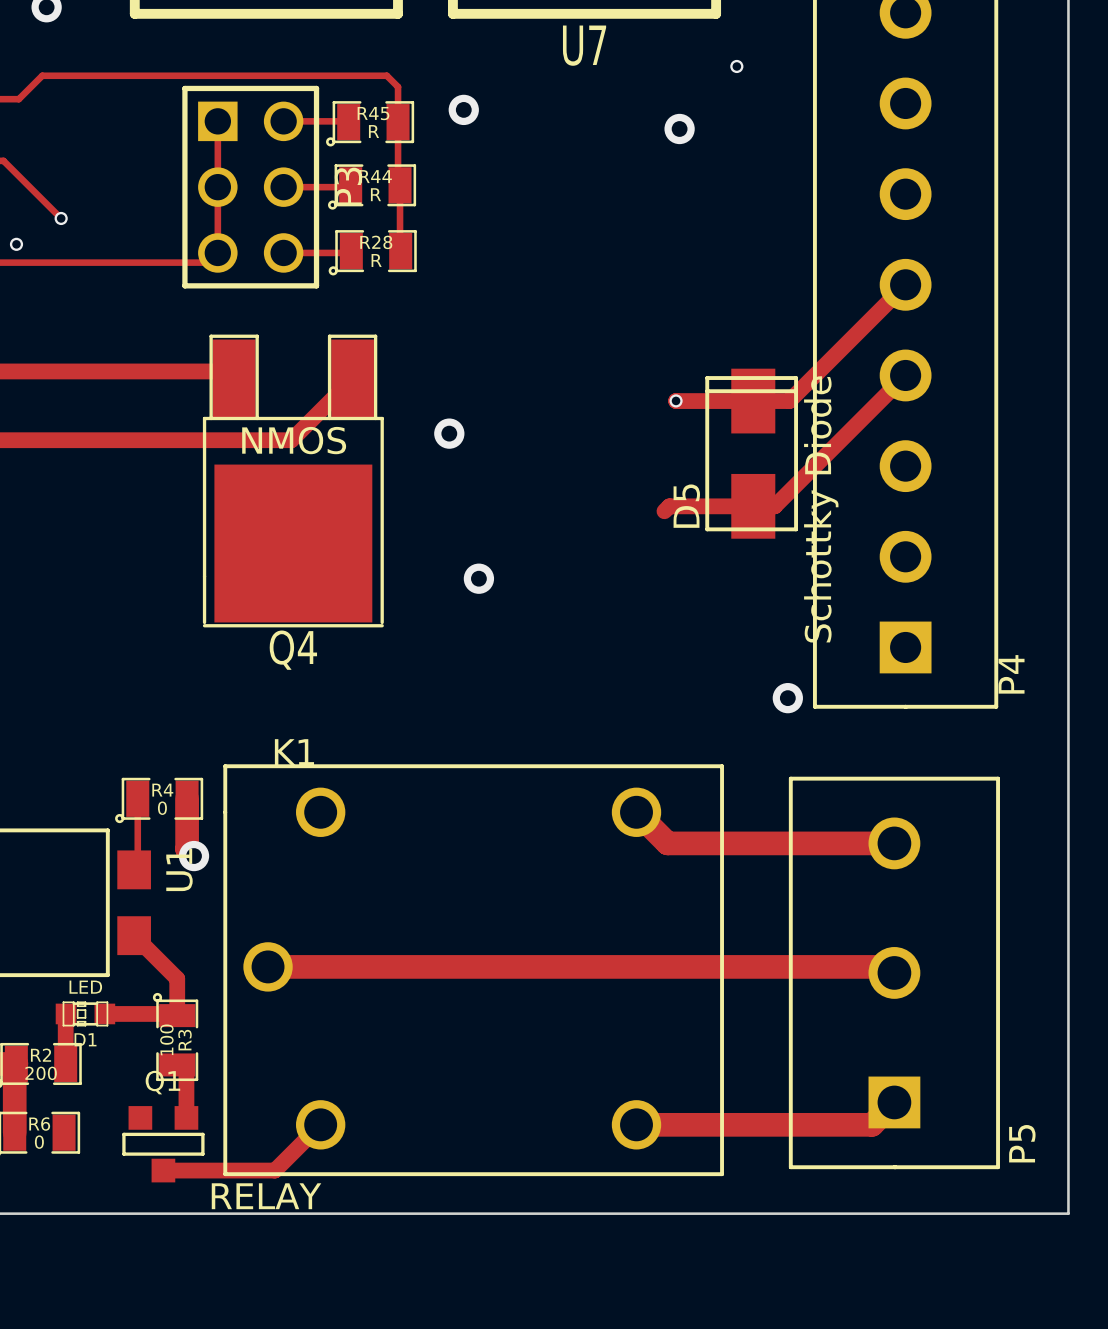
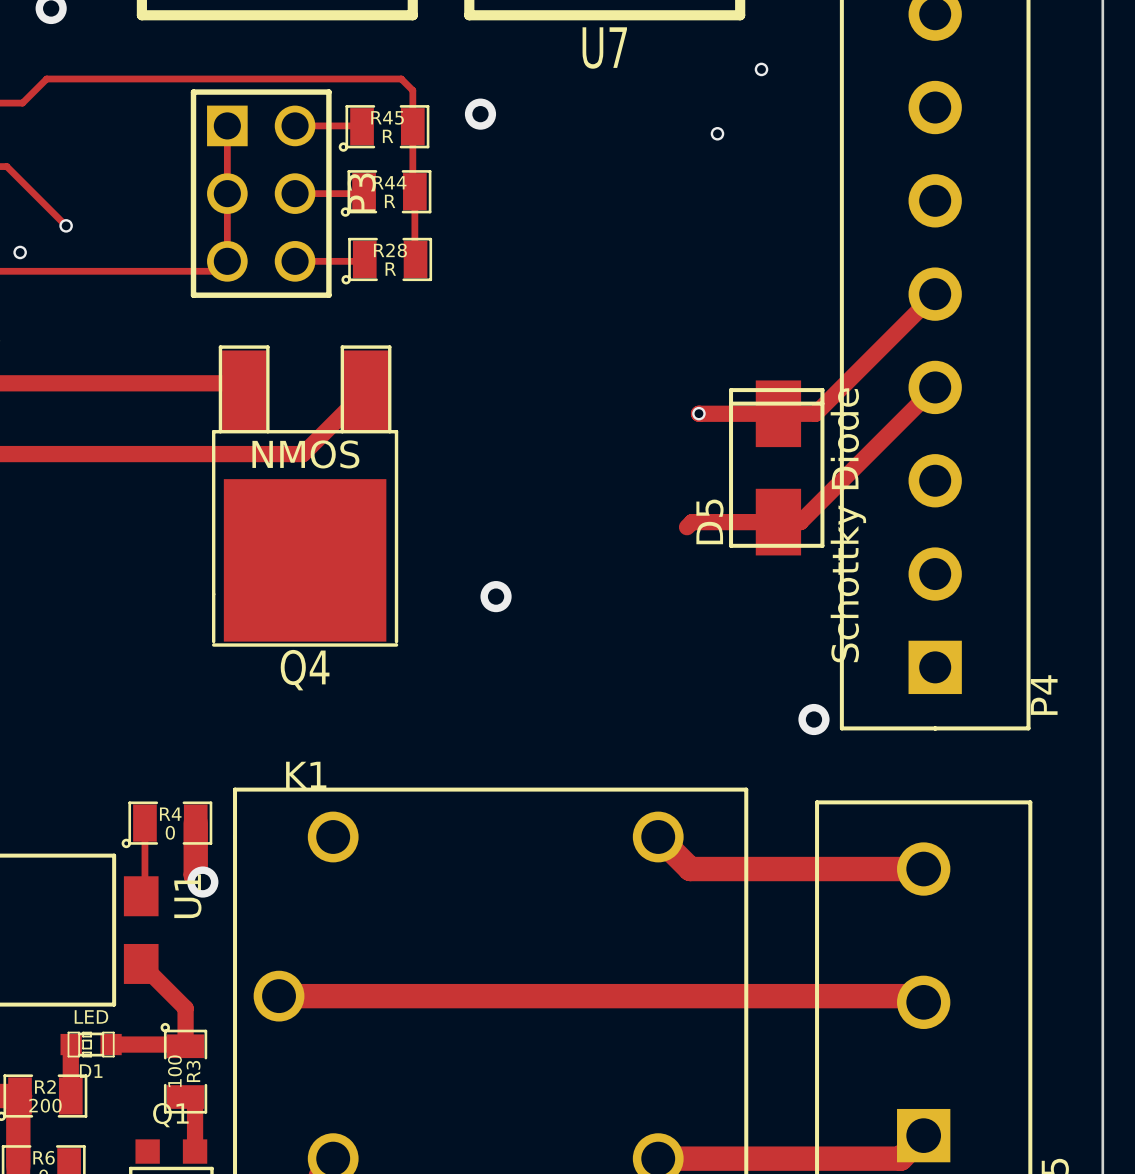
via size: [664, 113, 695, 145] -> [710, 127, 725, 141]
via: (449, 433) -> none

